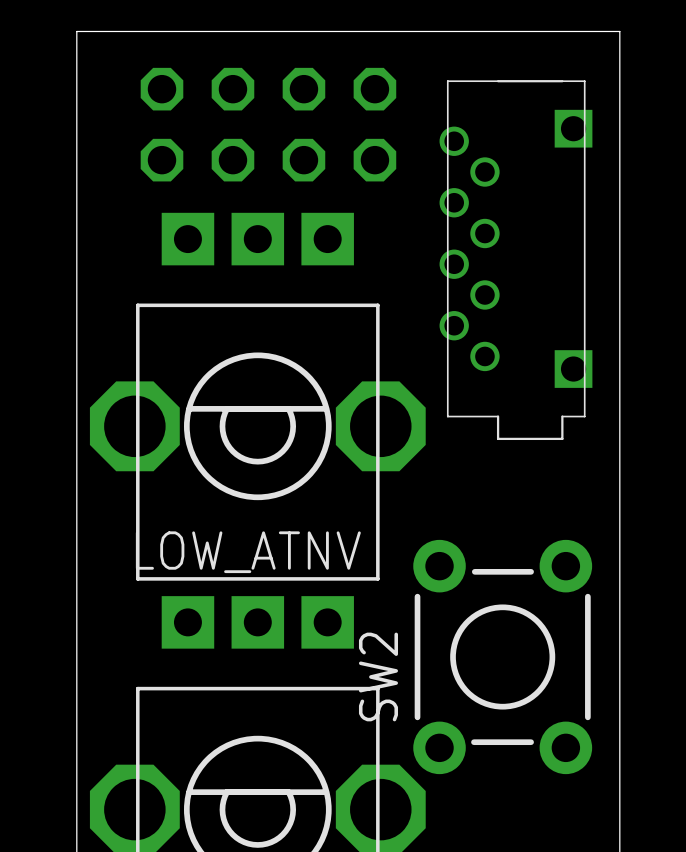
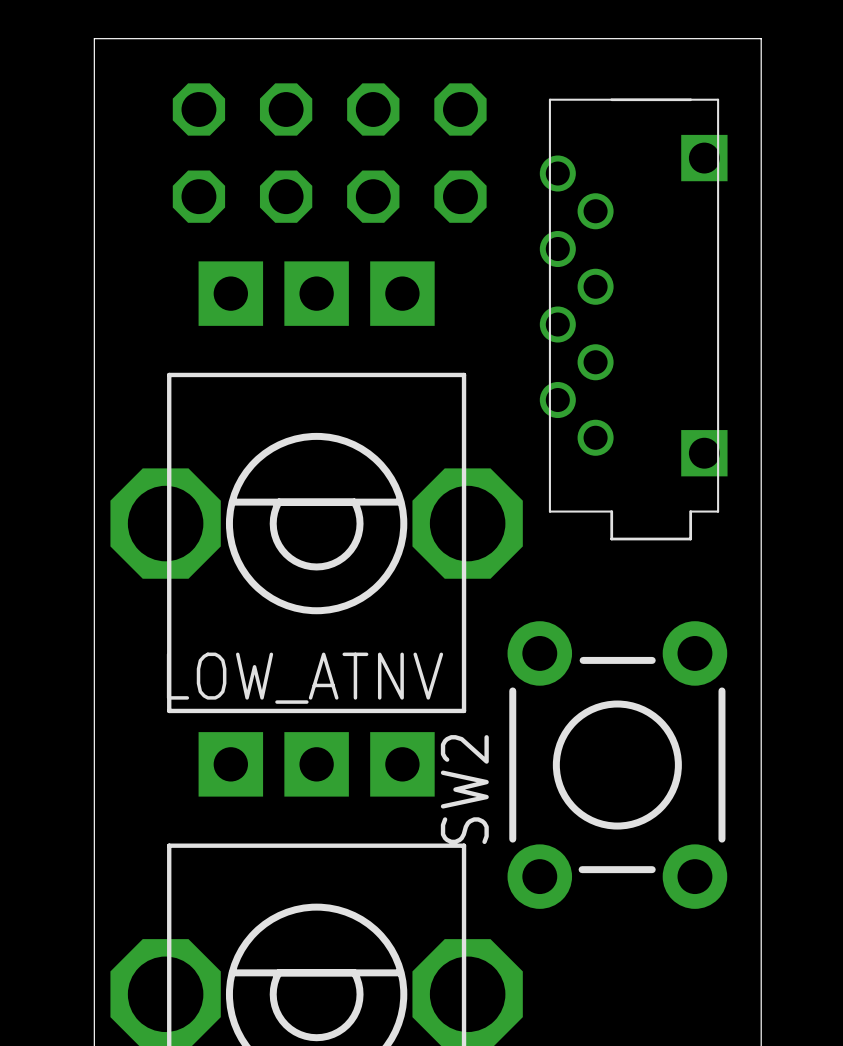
SW2 position: (502, 657) -> (617, 765)

